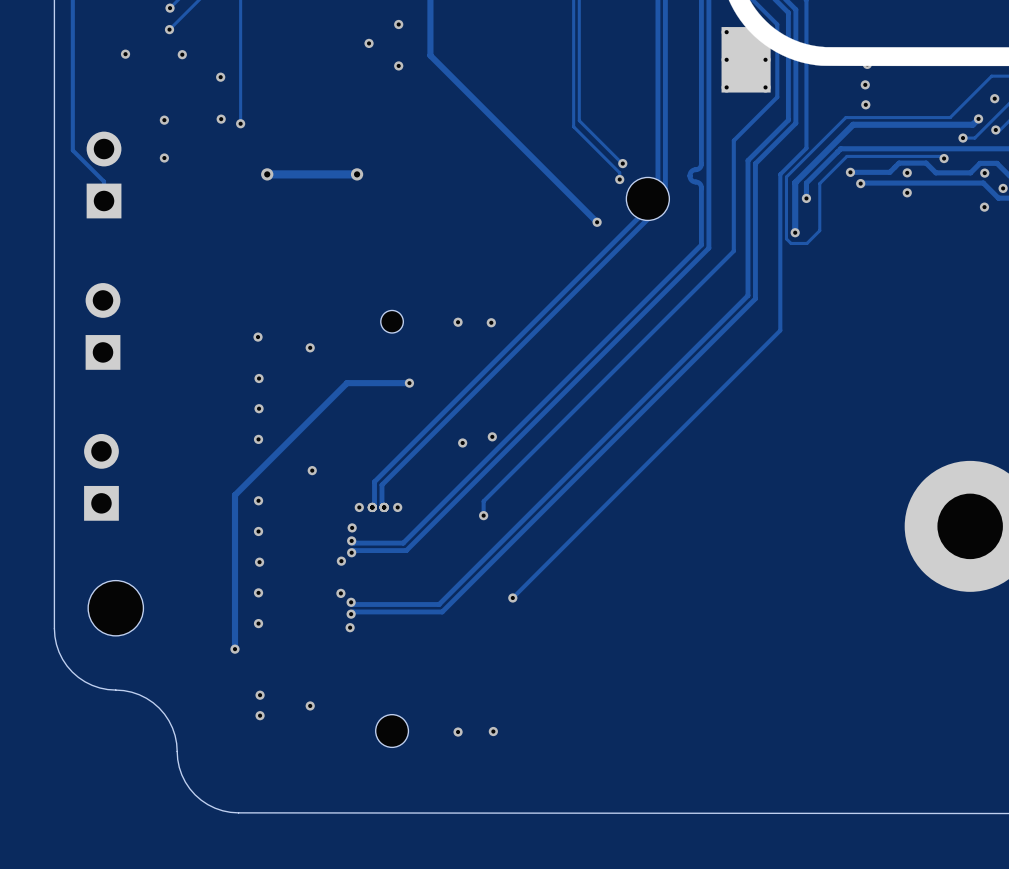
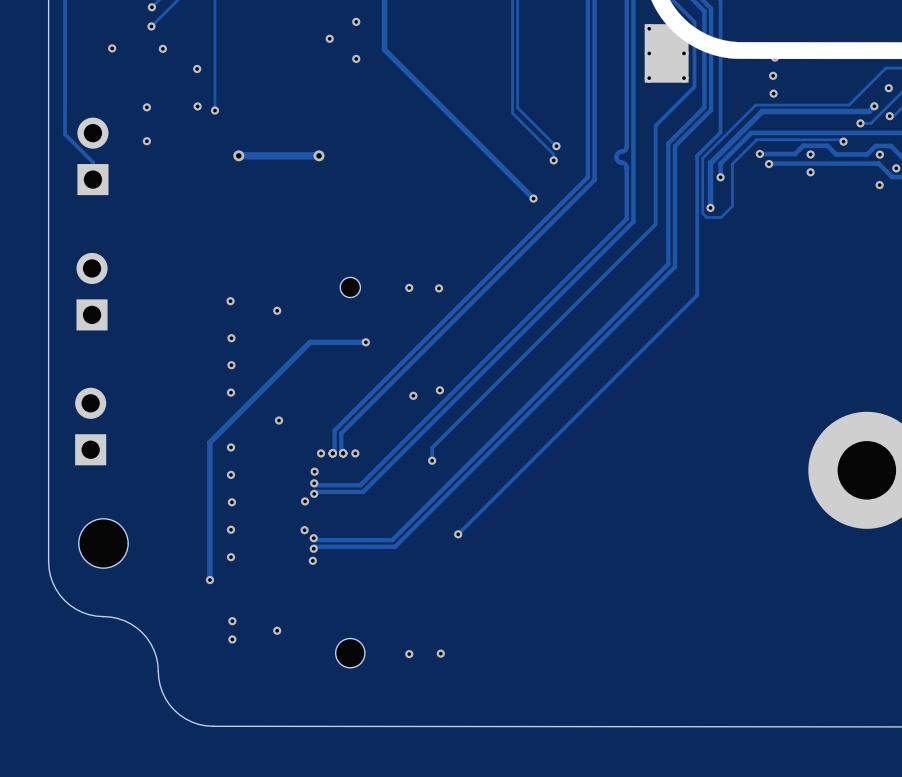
part: (647, 198) -> none

